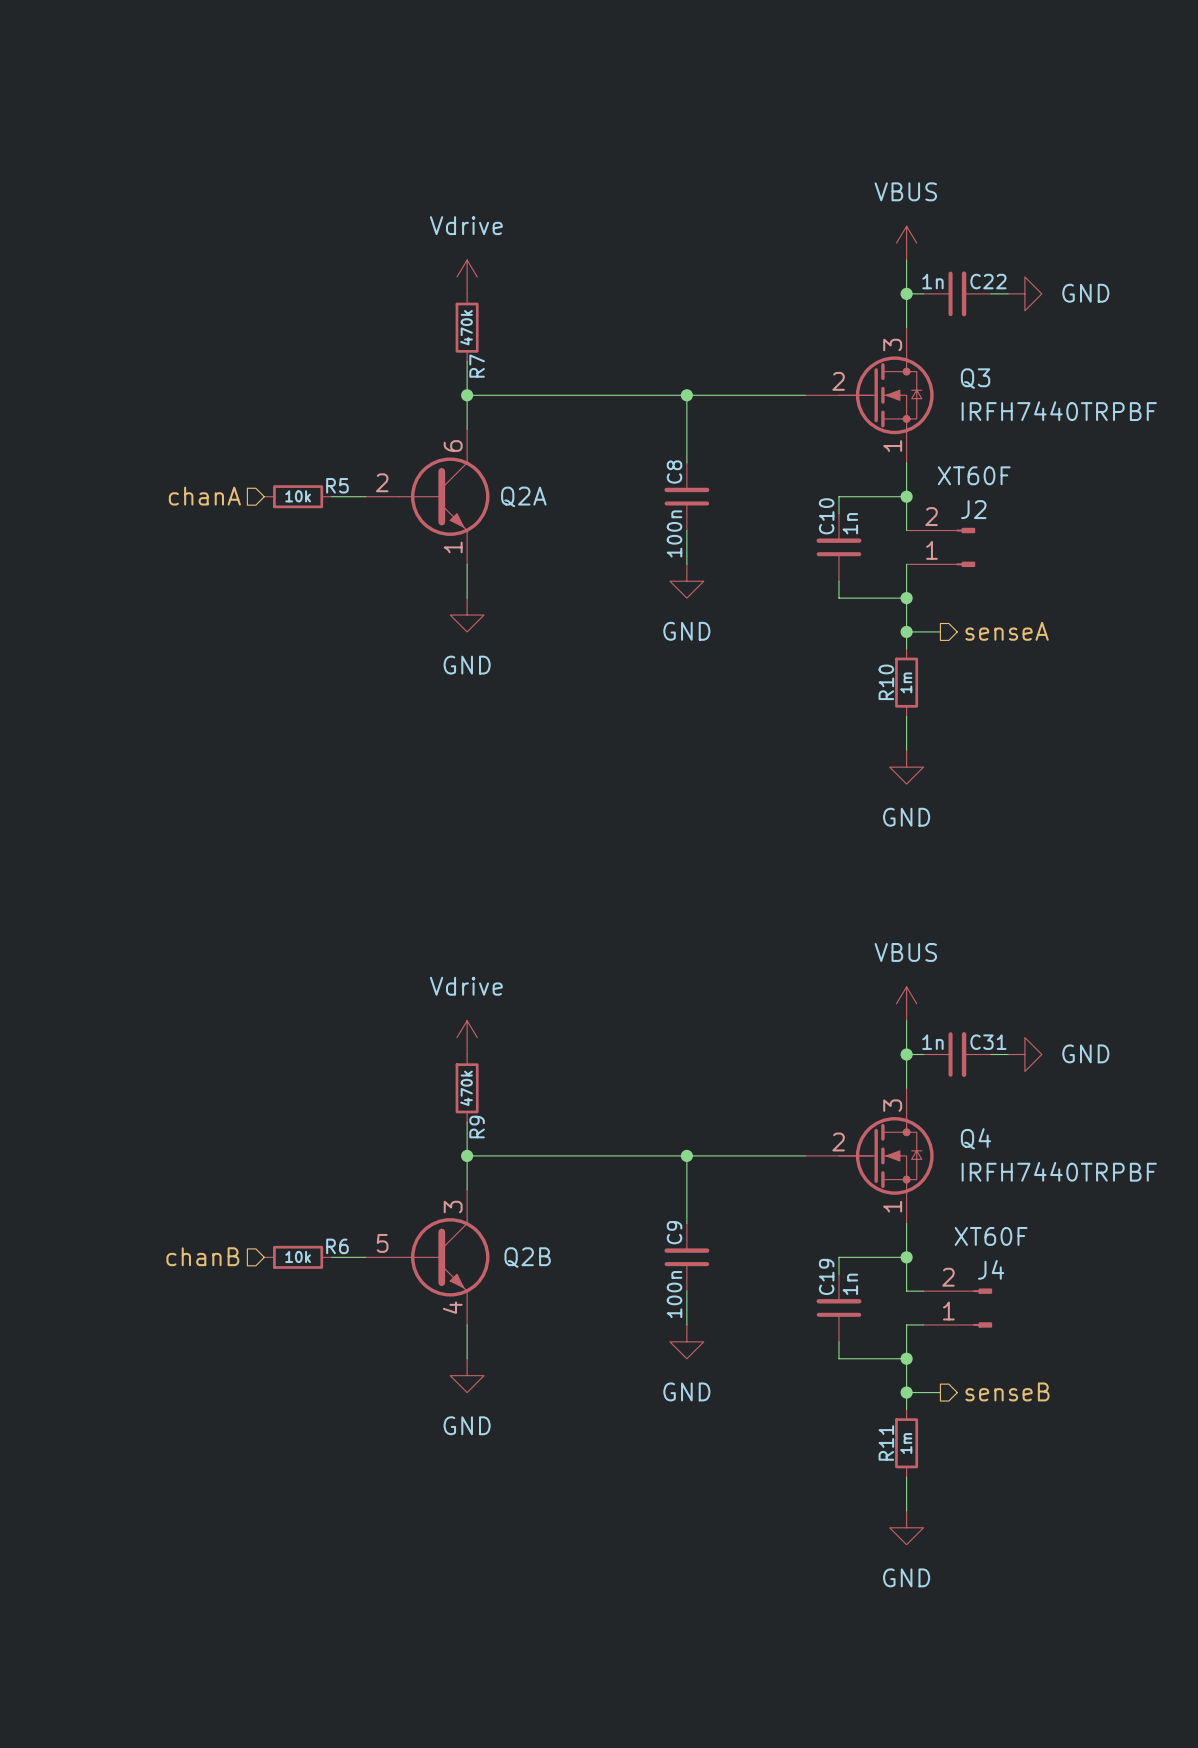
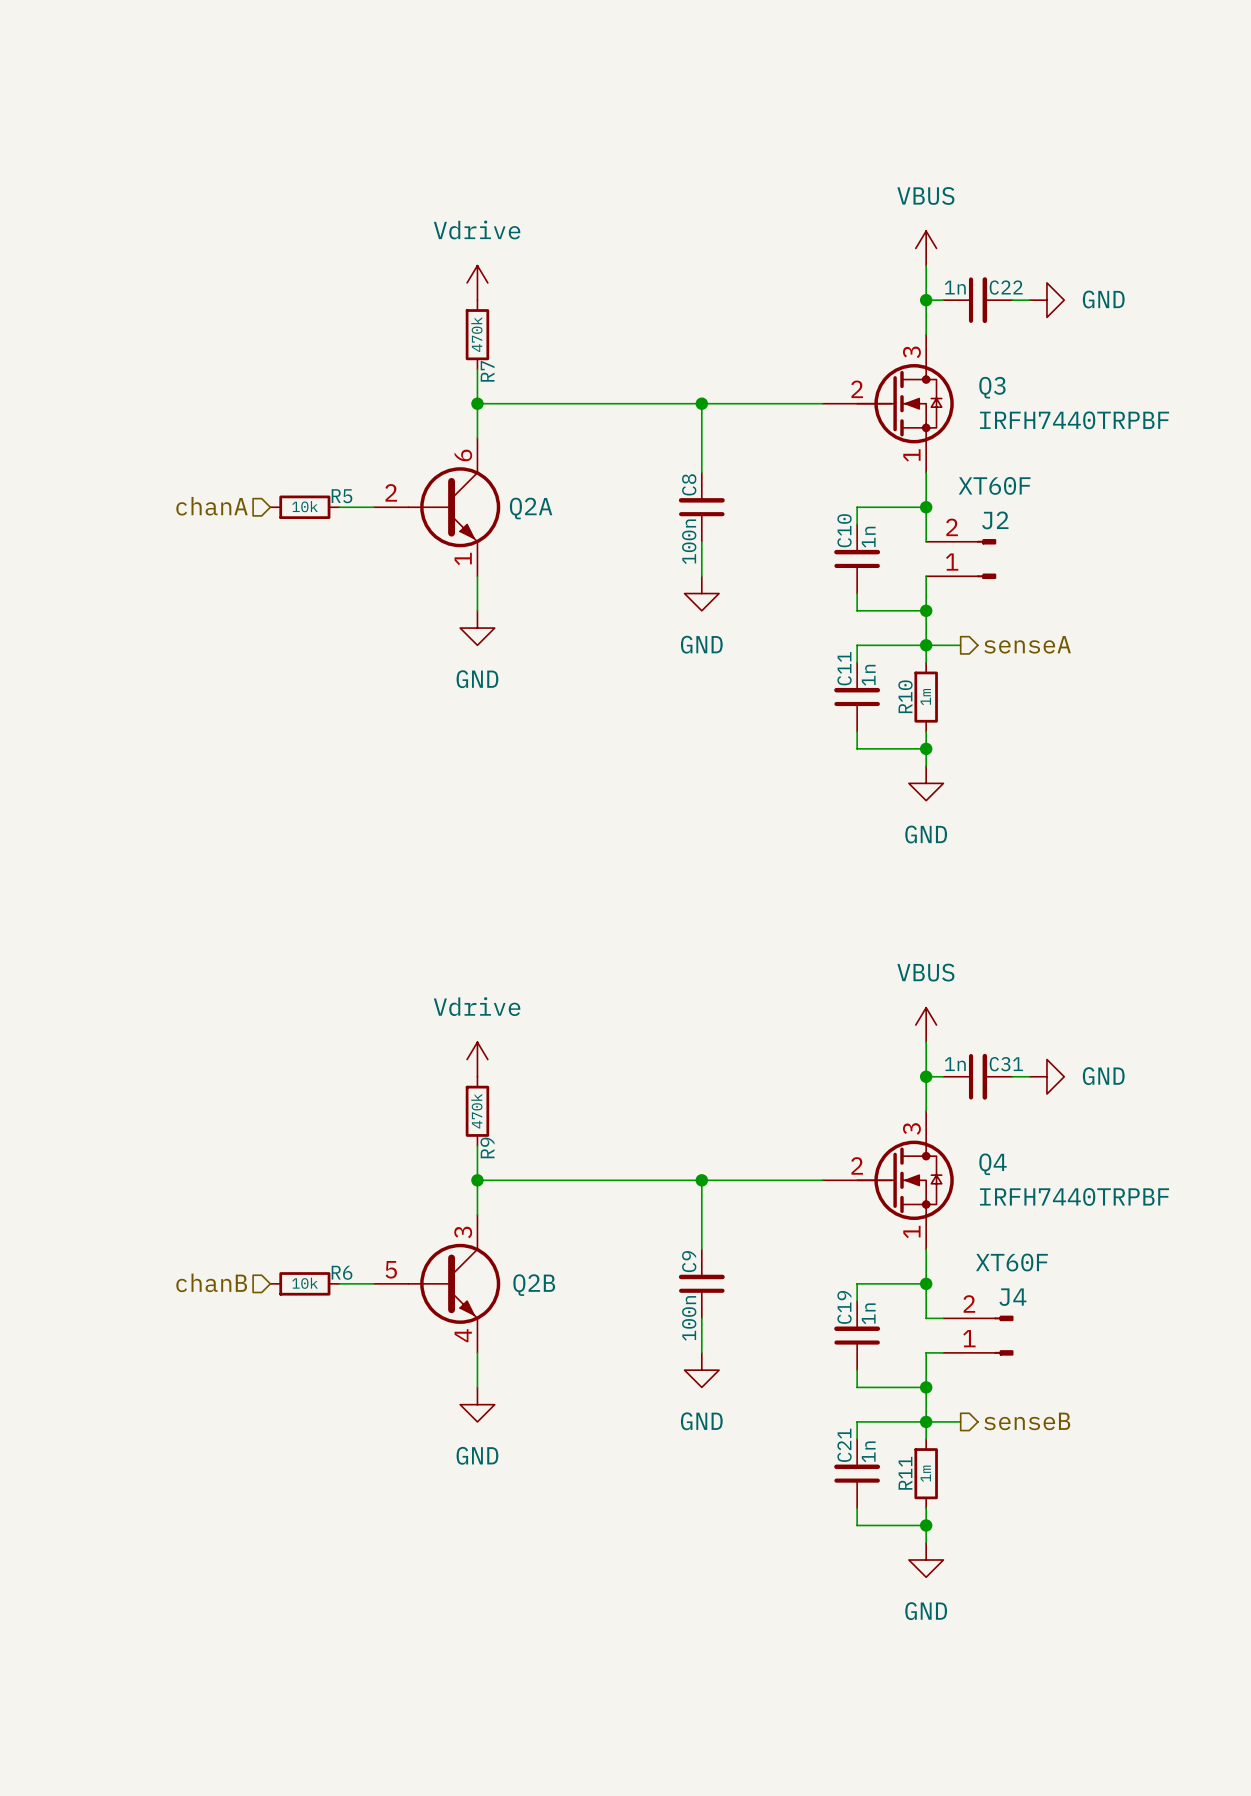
wire: none -> (926, 645) (857, 645) (857, 662)
C11: none -> 1n (857, 697)
wire: none -> (857, 731) (857, 748) (926, 748)
junction: none -> (926, 748)
wire: none -> (926, 1421) (857, 1421) (857, 1439)
C21: none -> 1n (857, 1473)
wire: none -> (857, 1508) (857, 1525) (926, 1525)
junction: none -> (926, 1525)

